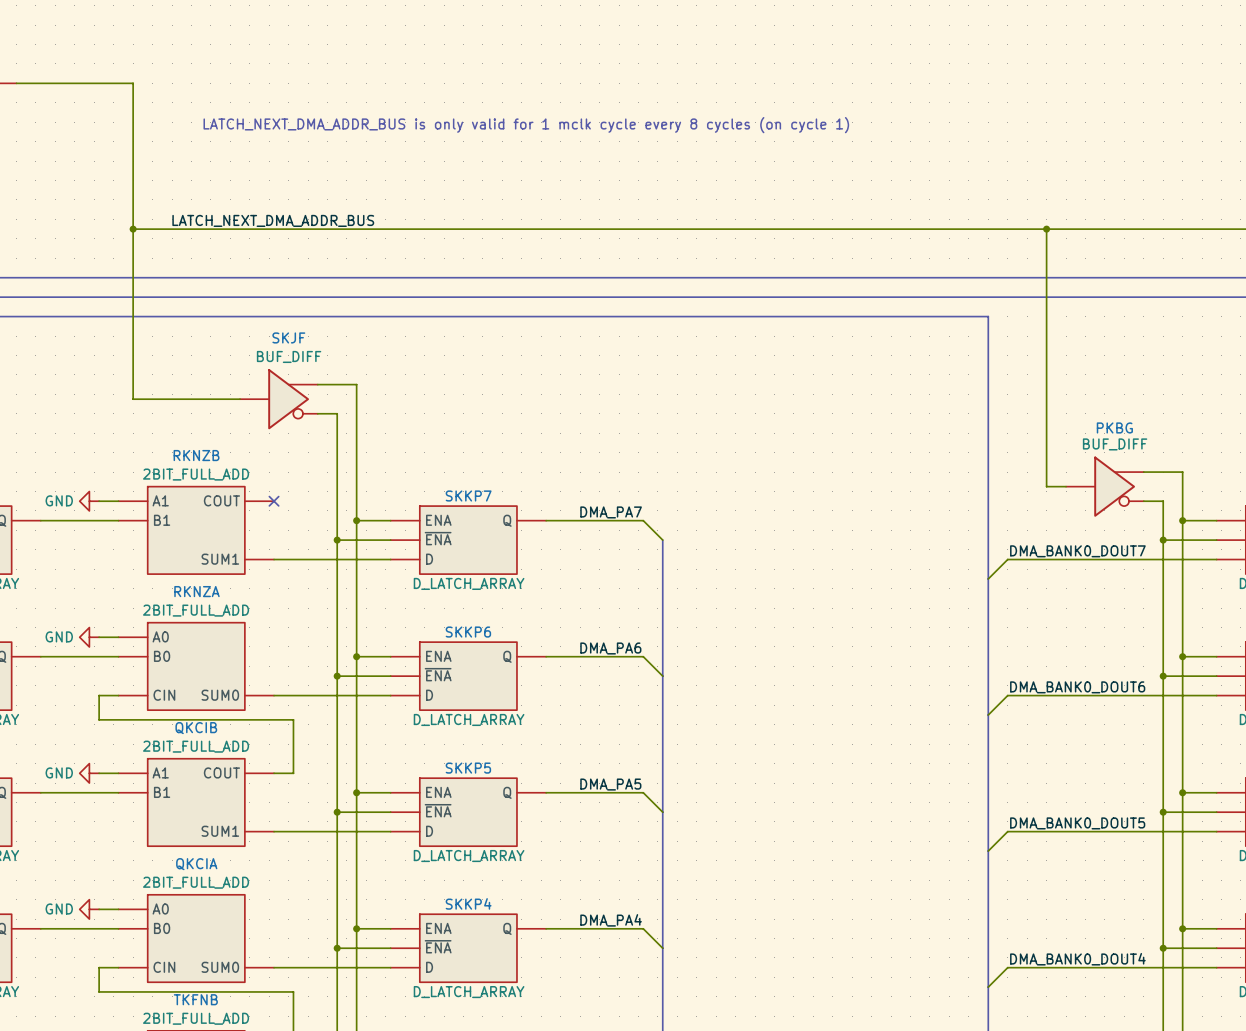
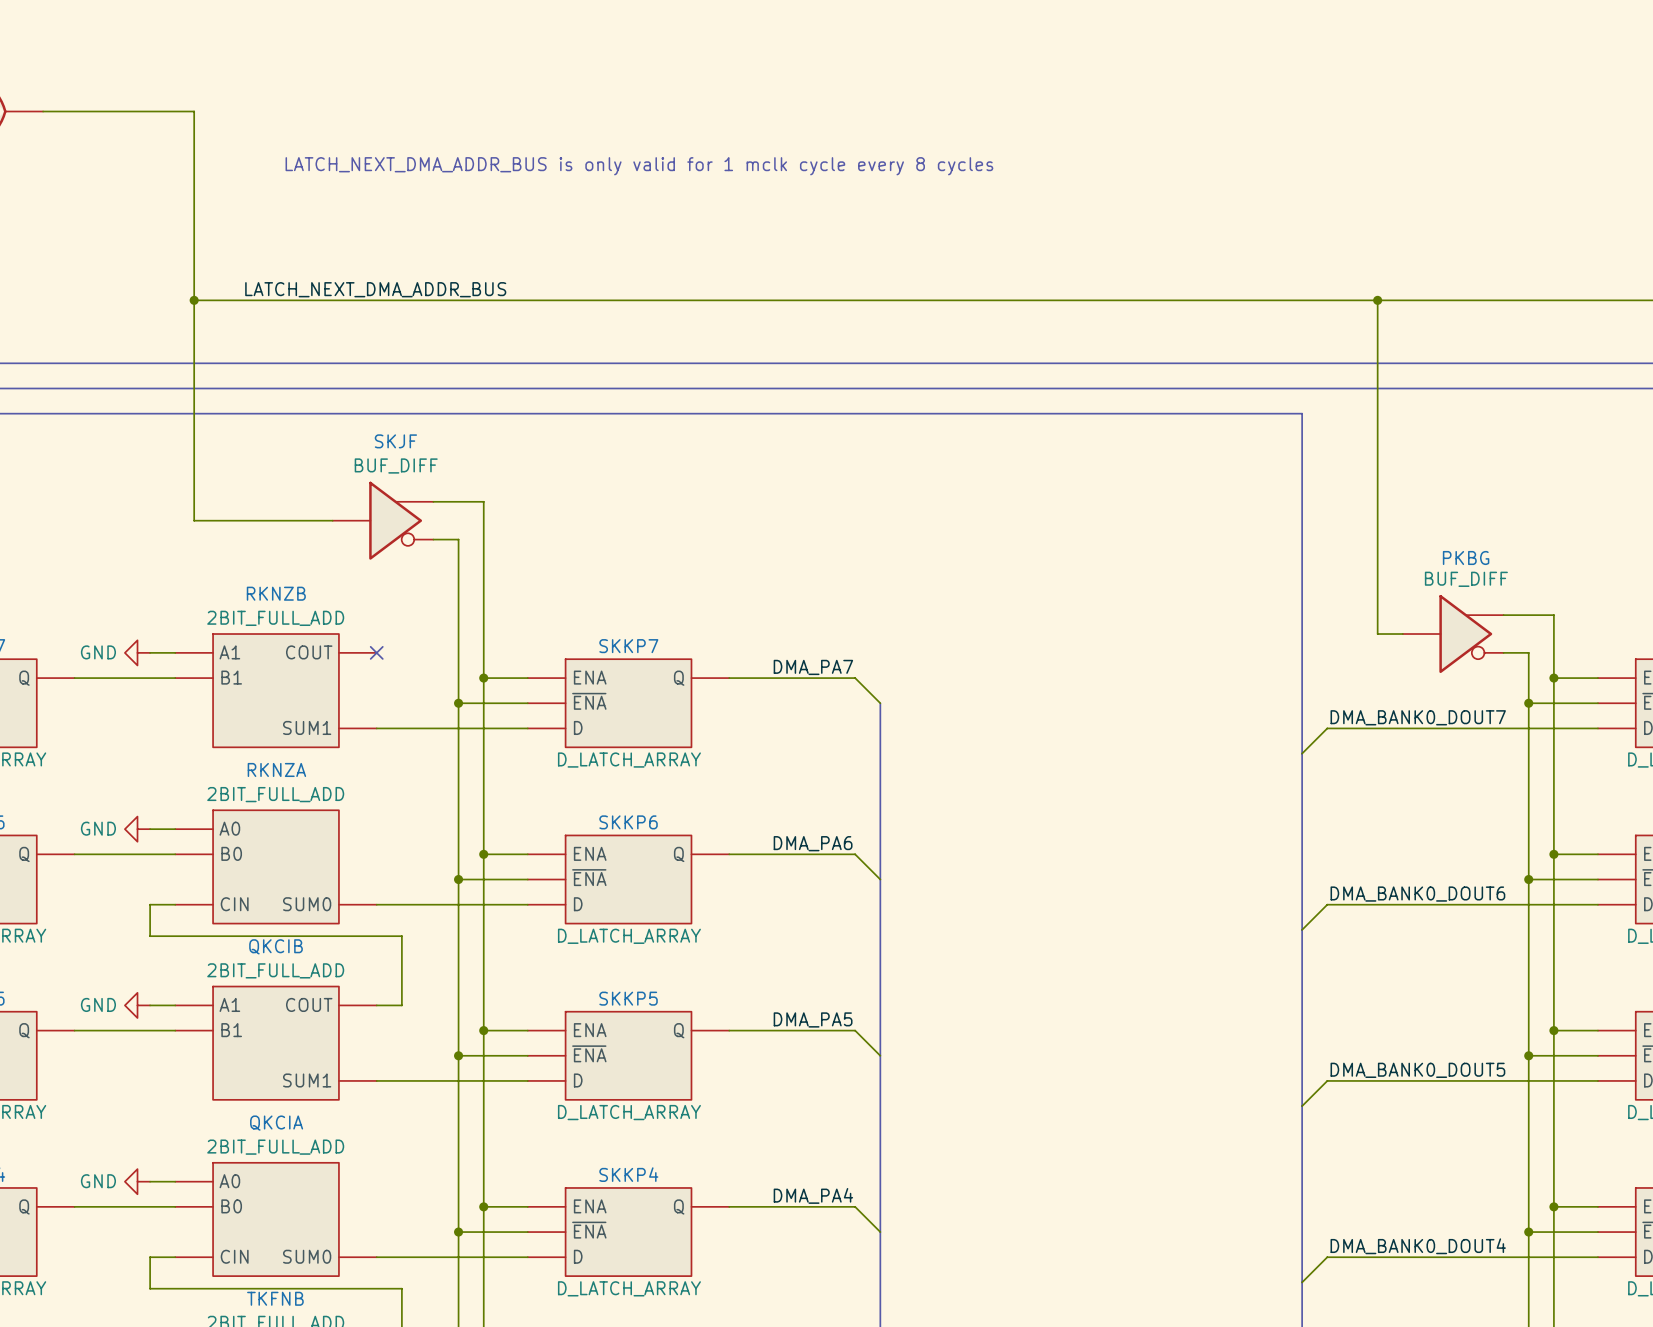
text: LATCH_NEXT_DMA_ADDR_BUS is only valid for 1 mclk cycle every 8 cycles (on cycle 1) (526, 125) -> LATCH_NEXT_DMA_ADDR_BUS is only valid for 1 mclk cycle every 8 cycles (639, 166)

